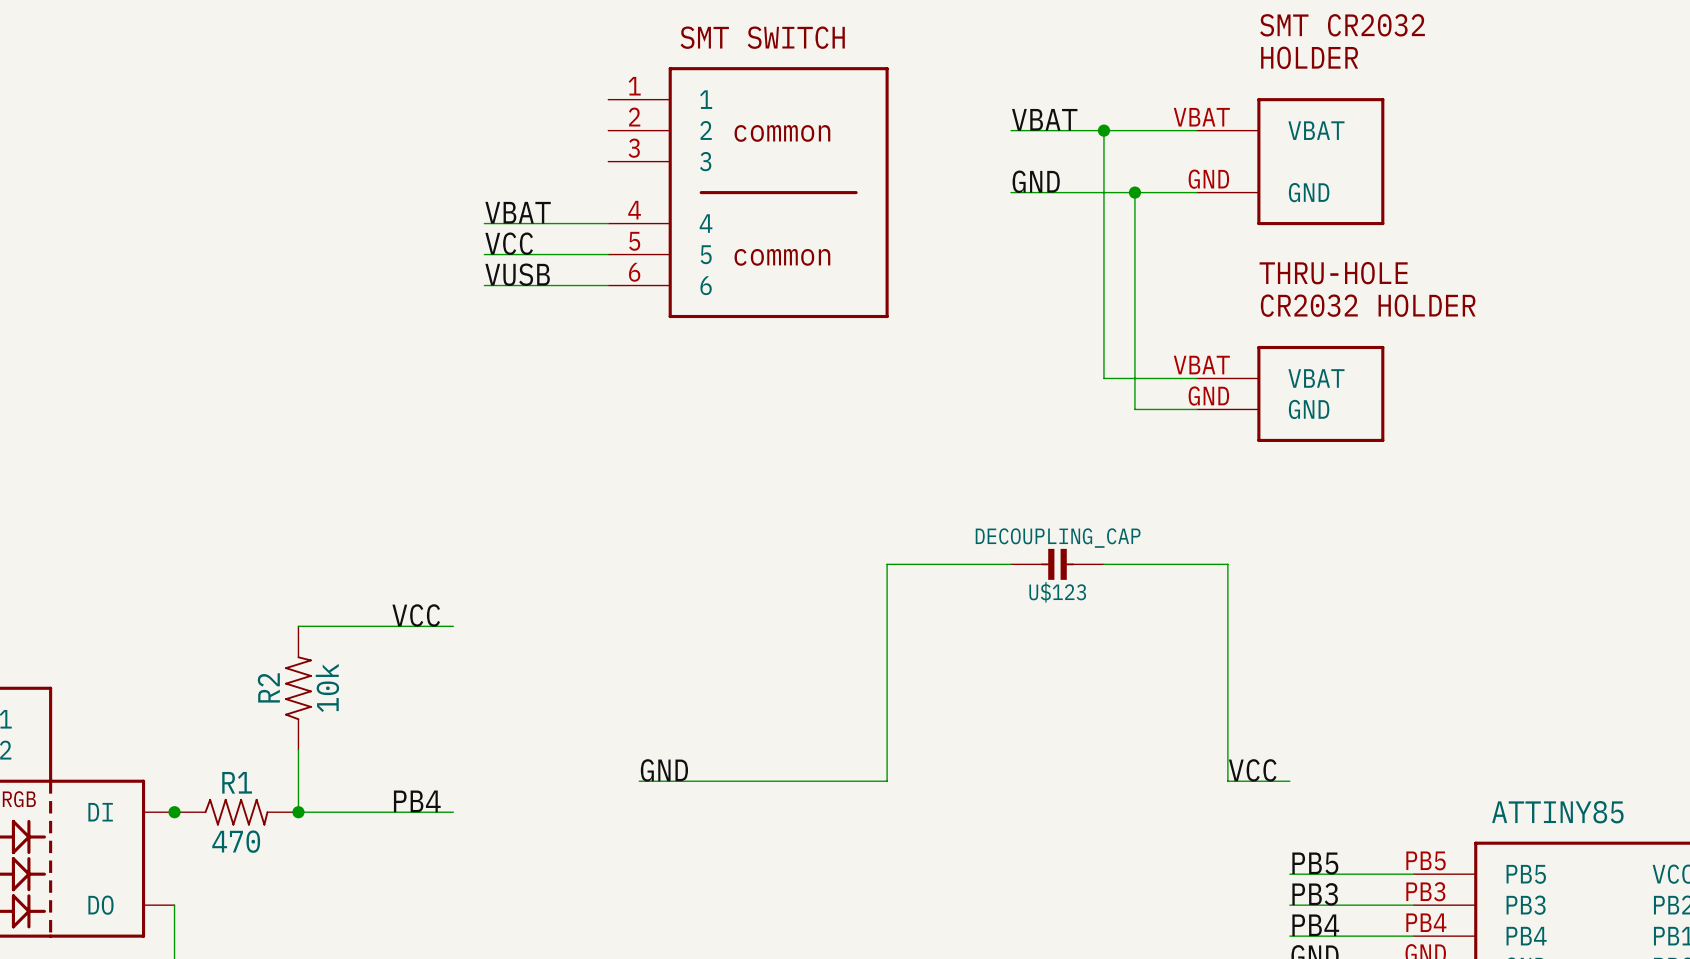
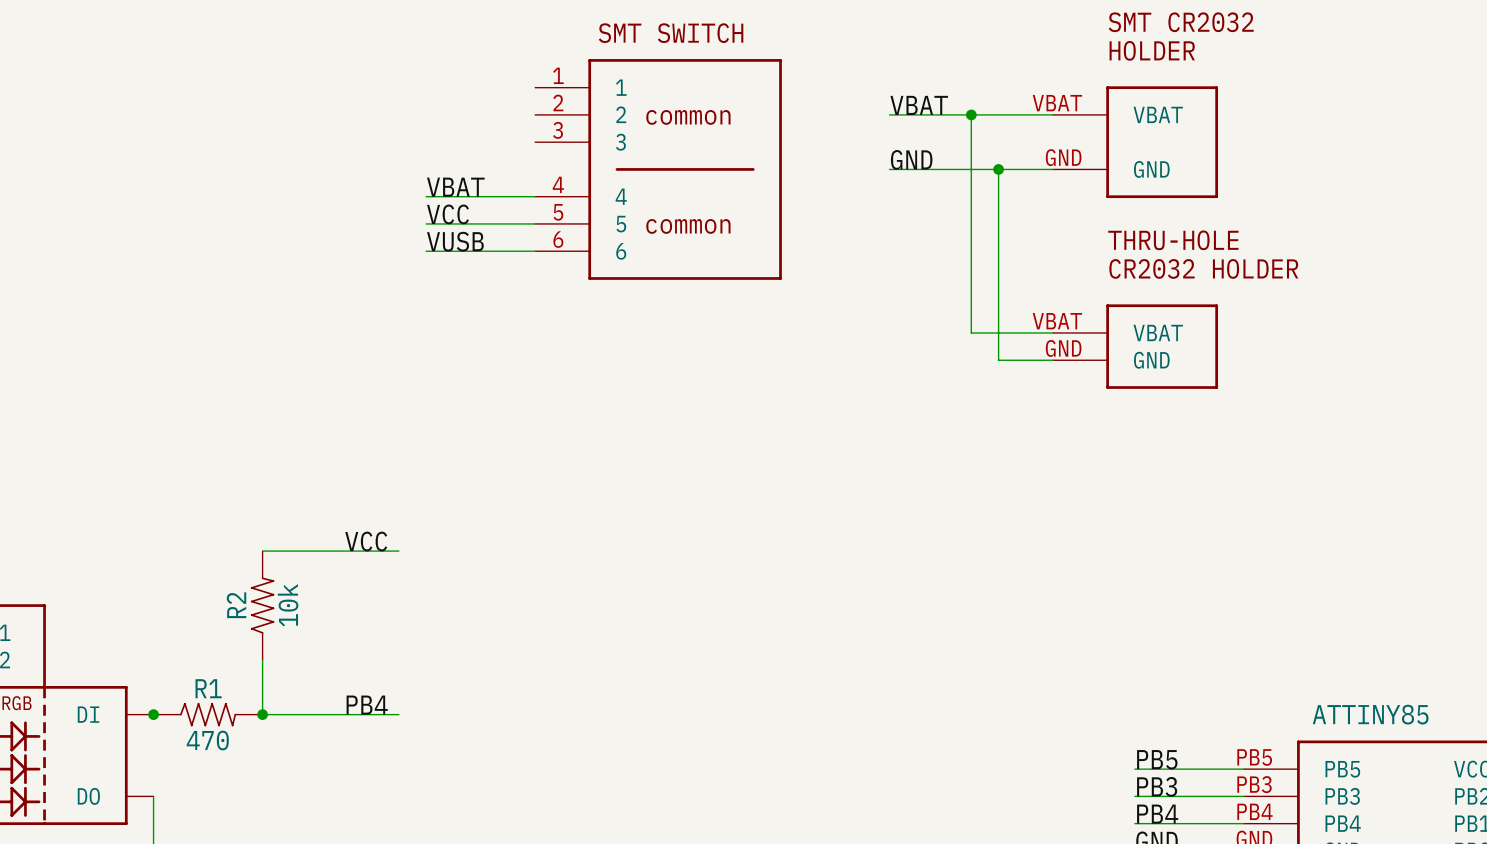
wire: (1011, 564) (887, 564) (887, 781) (639, 781) -> none
U$123: DECOUPLING_CAP (1057, 564) -> none
wire: (1103, 564) (1227, 564) (1227, 781) (1289, 781) -> none
label: GND (664, 770) -> none
label: VCC (1252, 770) -> none

